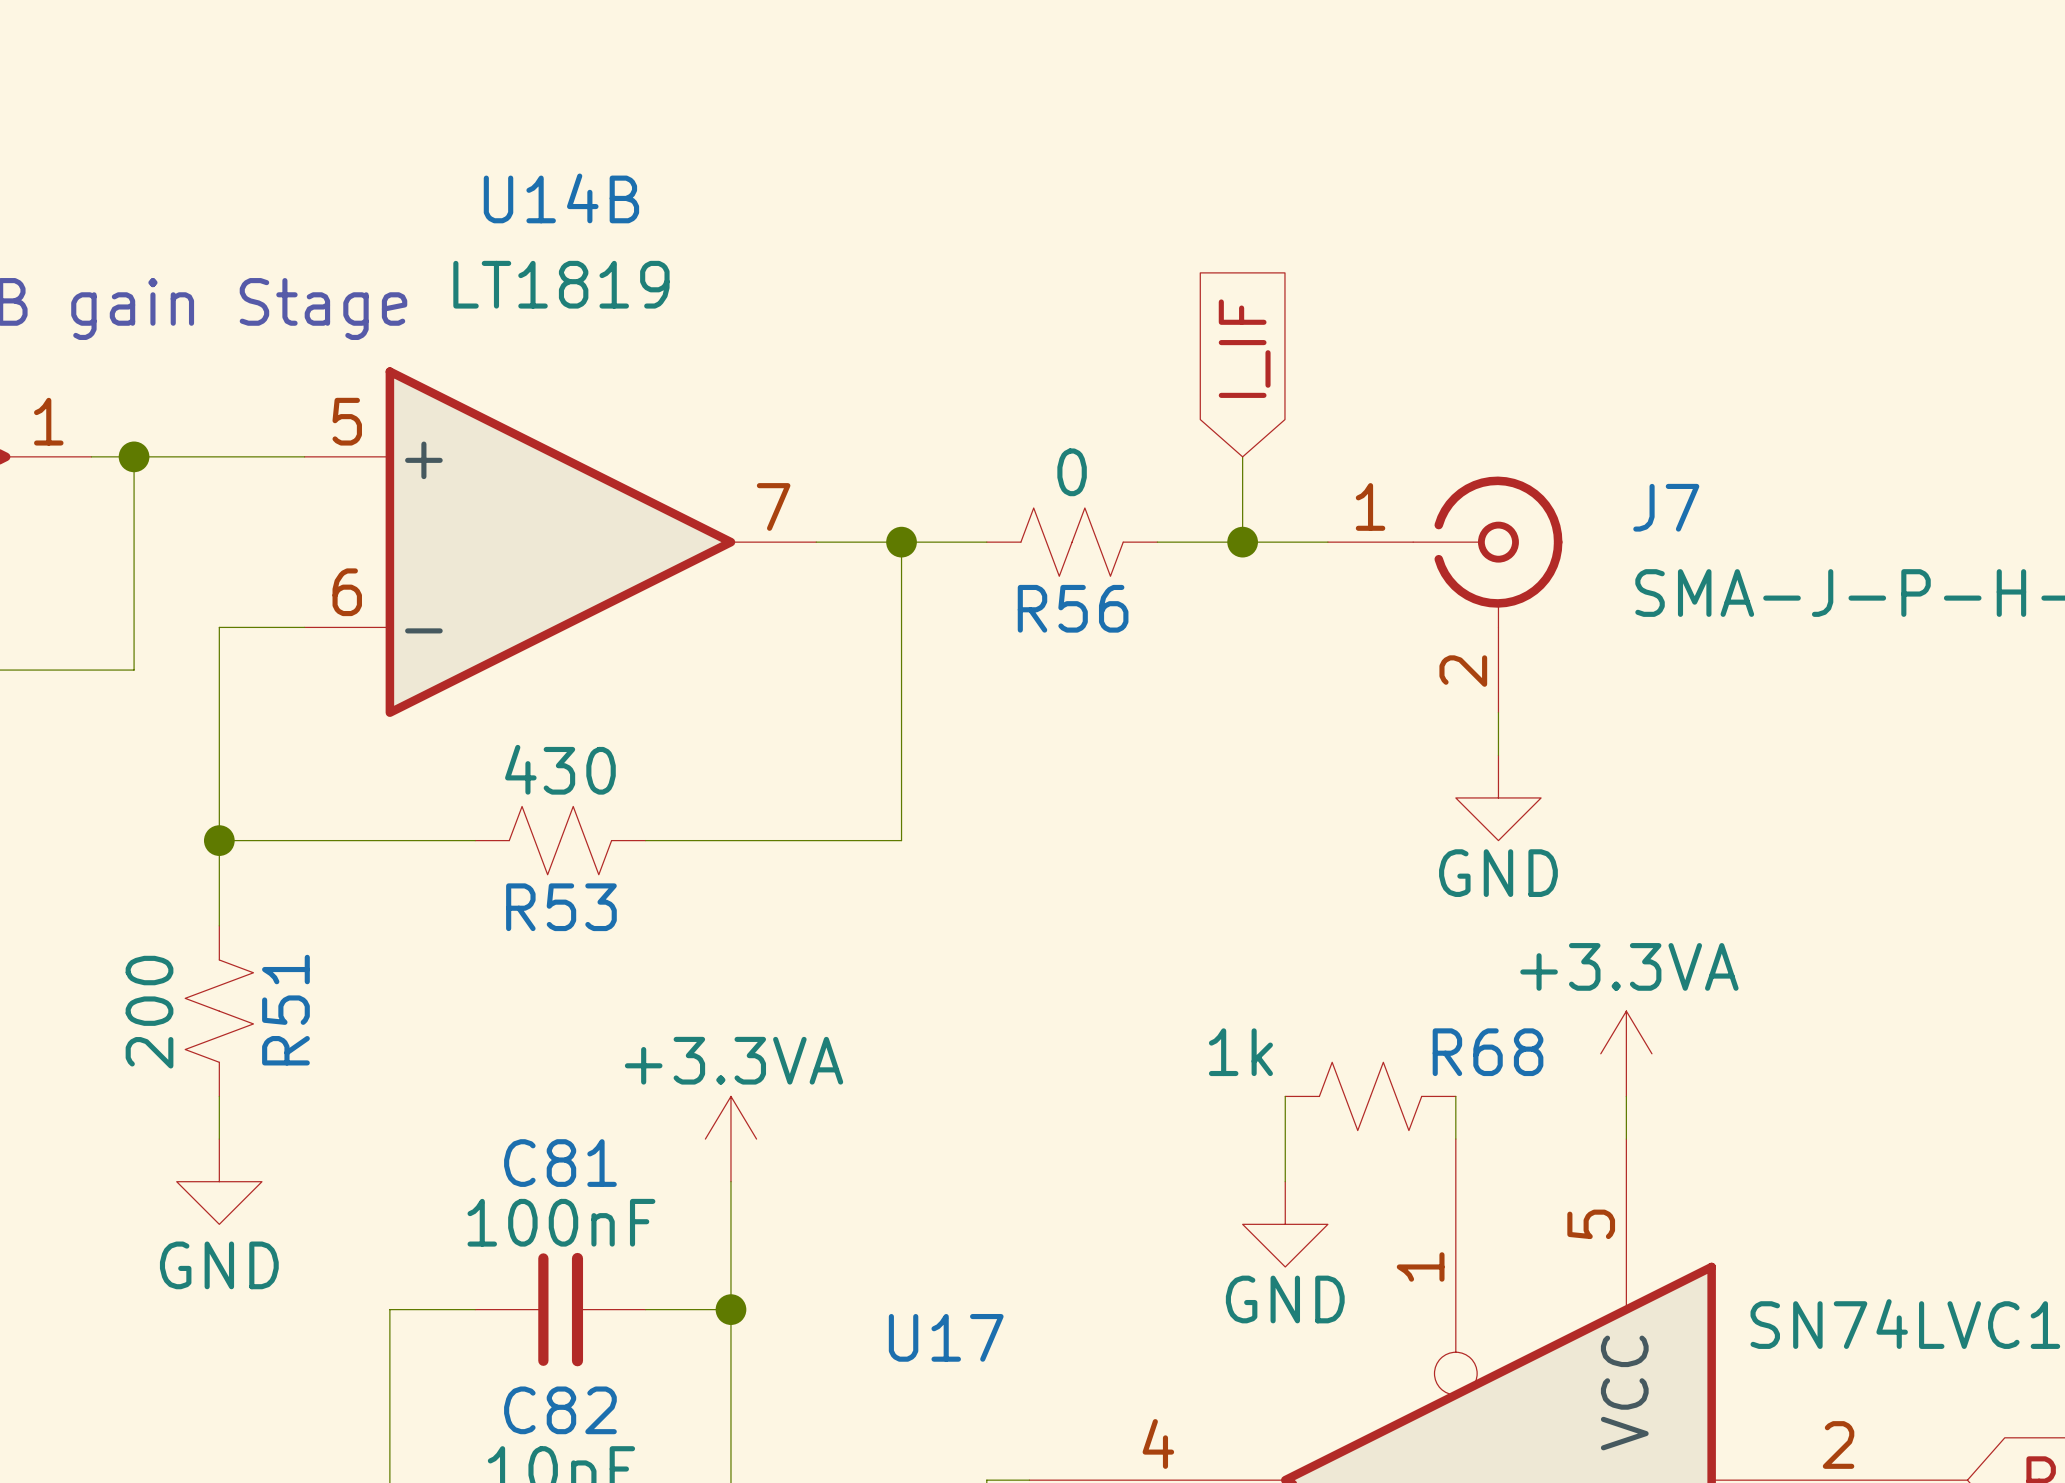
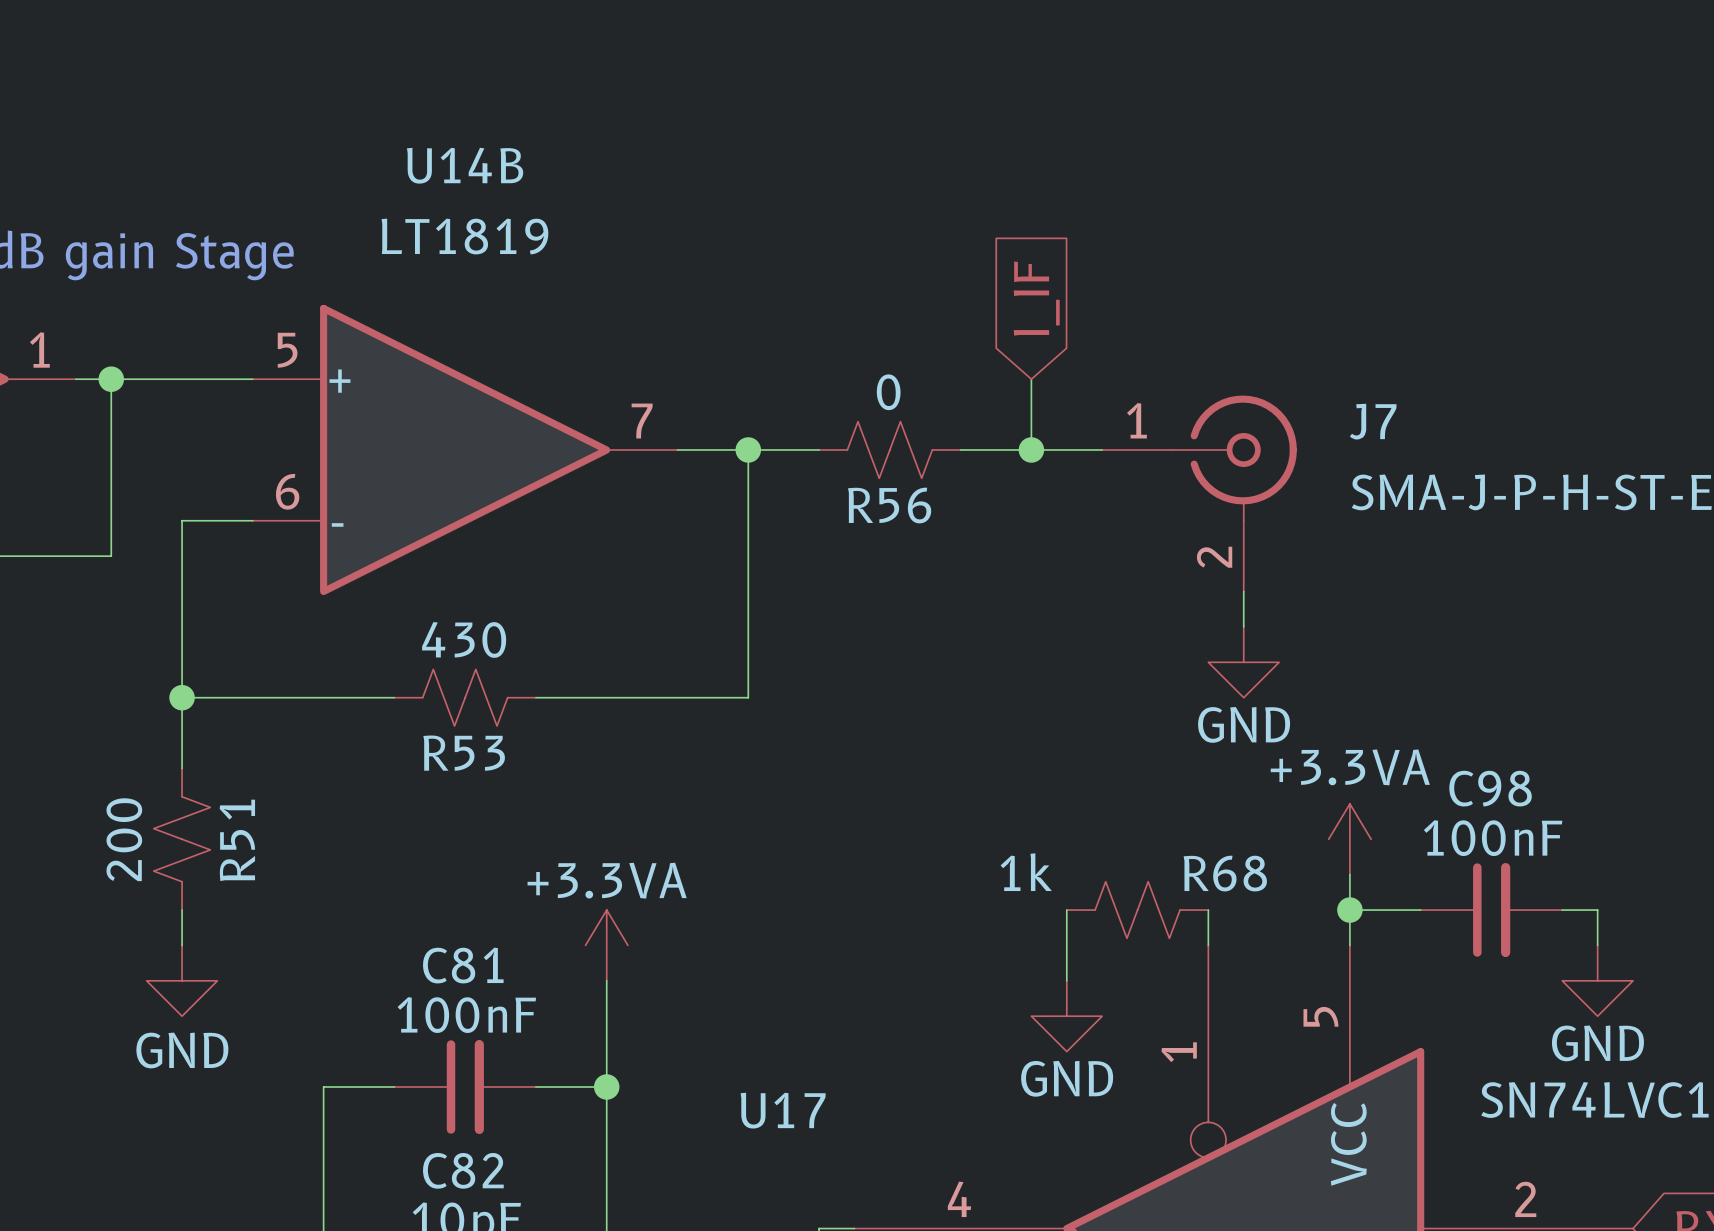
wire: none -> (1349, 874) (1349, 910) (1420, 910)
power symbol position: +3.3VA (1626, 1053) -> +3.3VA (1349, 839)
junction: none -> (1349, 910)
C98: none -> 100nF (1491, 910)
wire: none -> (1562, 910) (1597, 910) (1597, 945)
power symbol: none -> GND (1597, 980)

